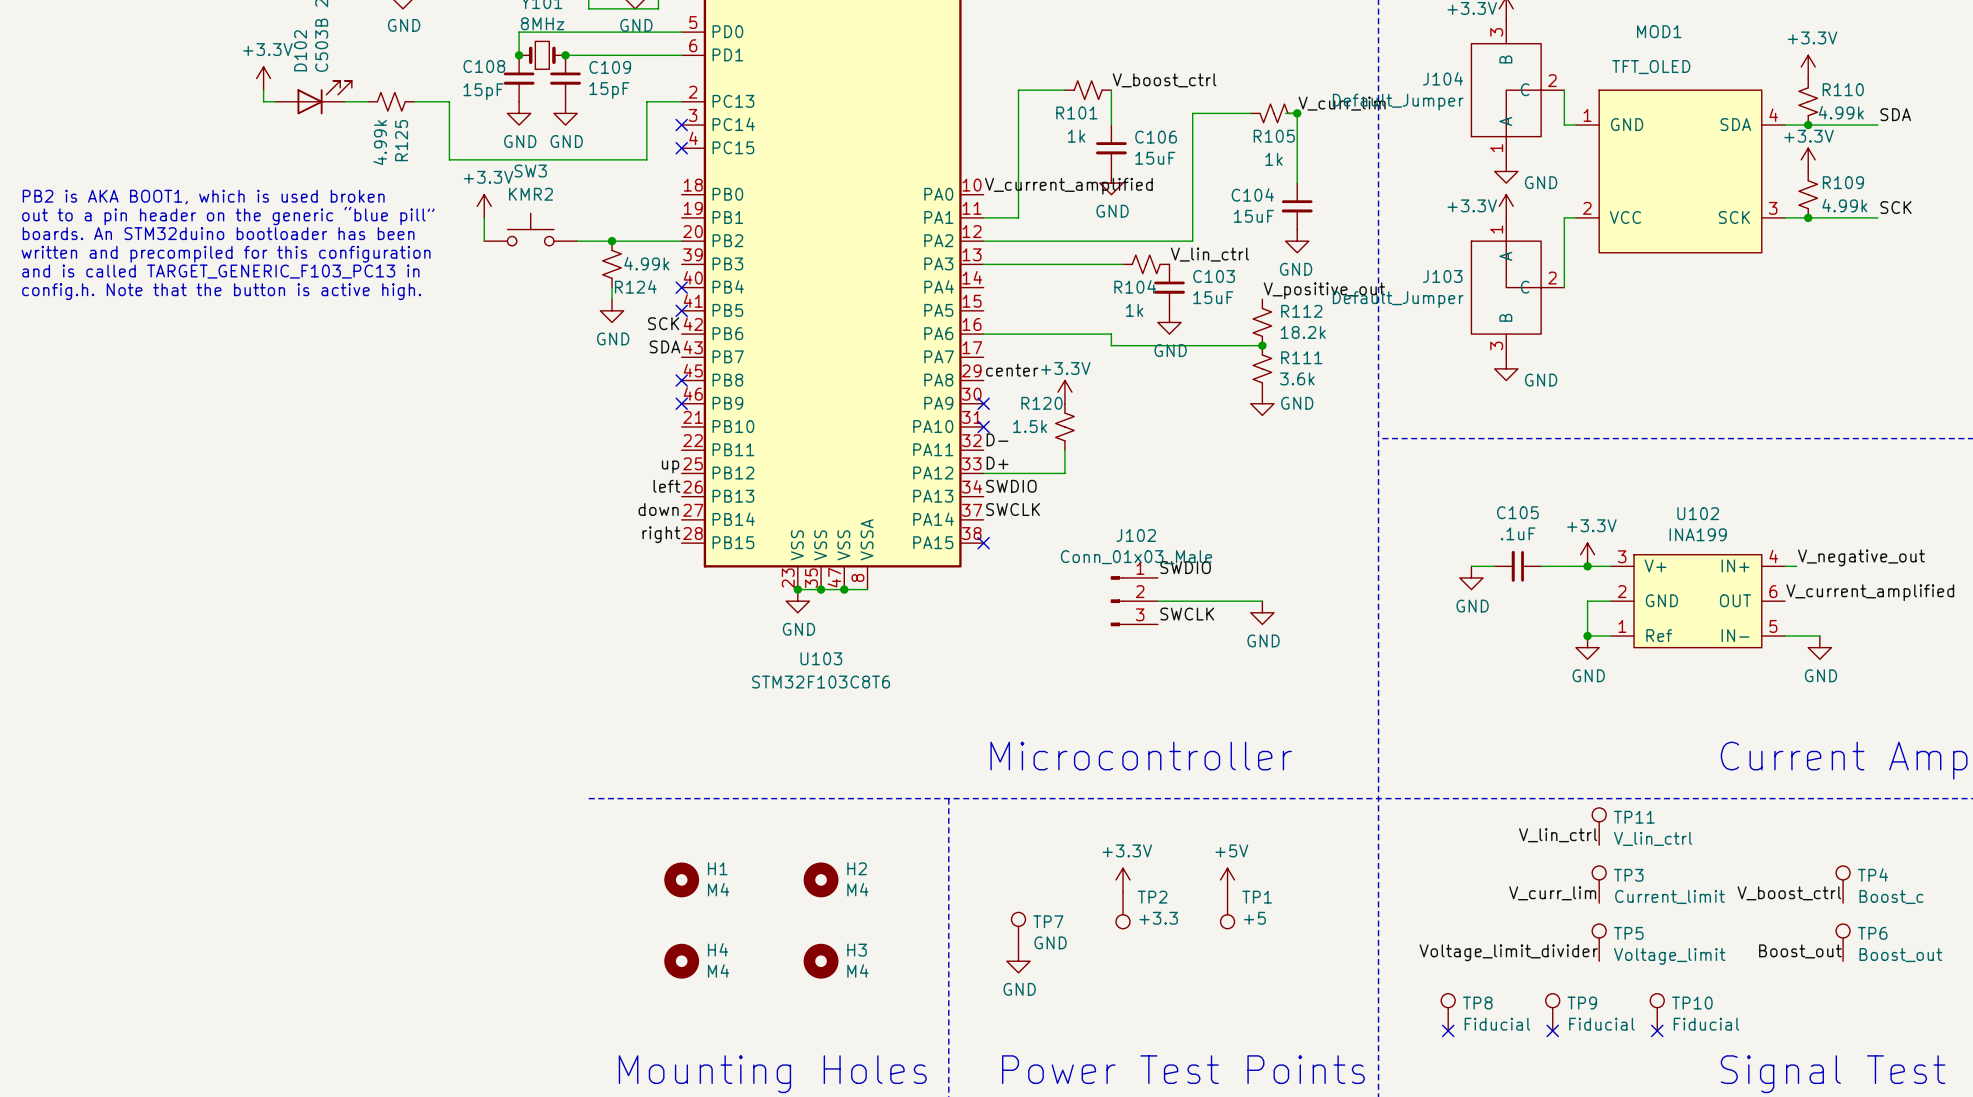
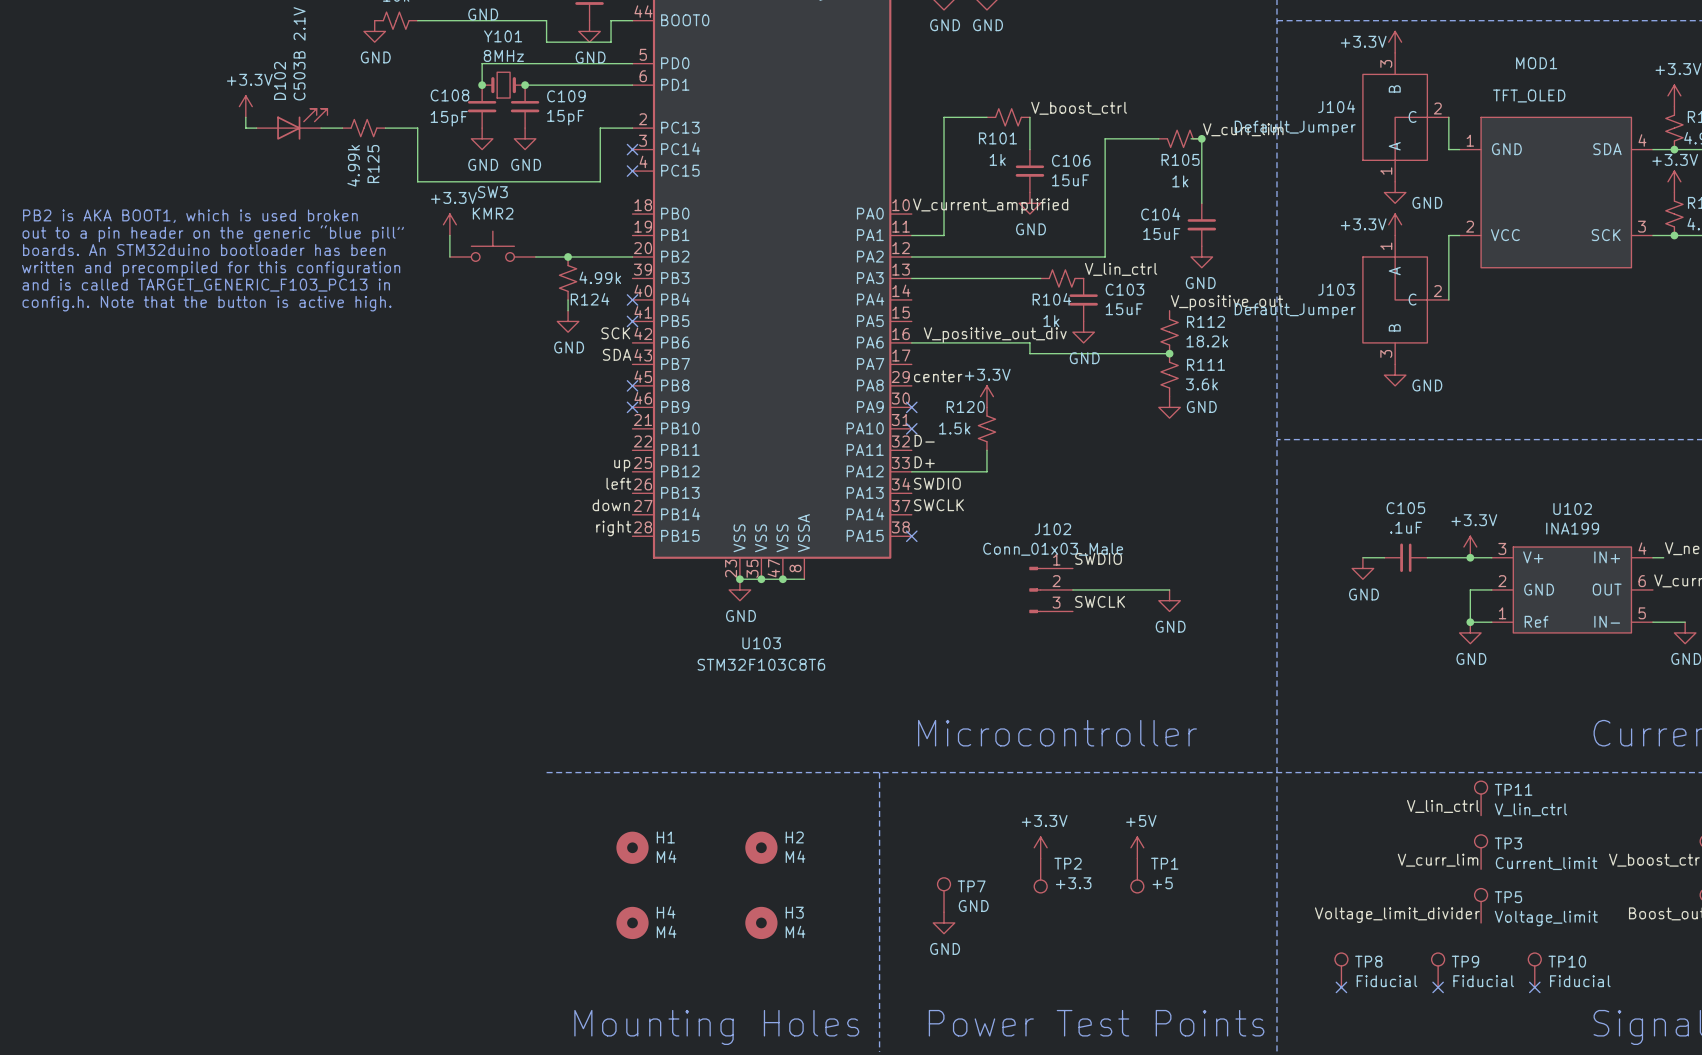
label: none -> V_positive_out_div (995, 335)

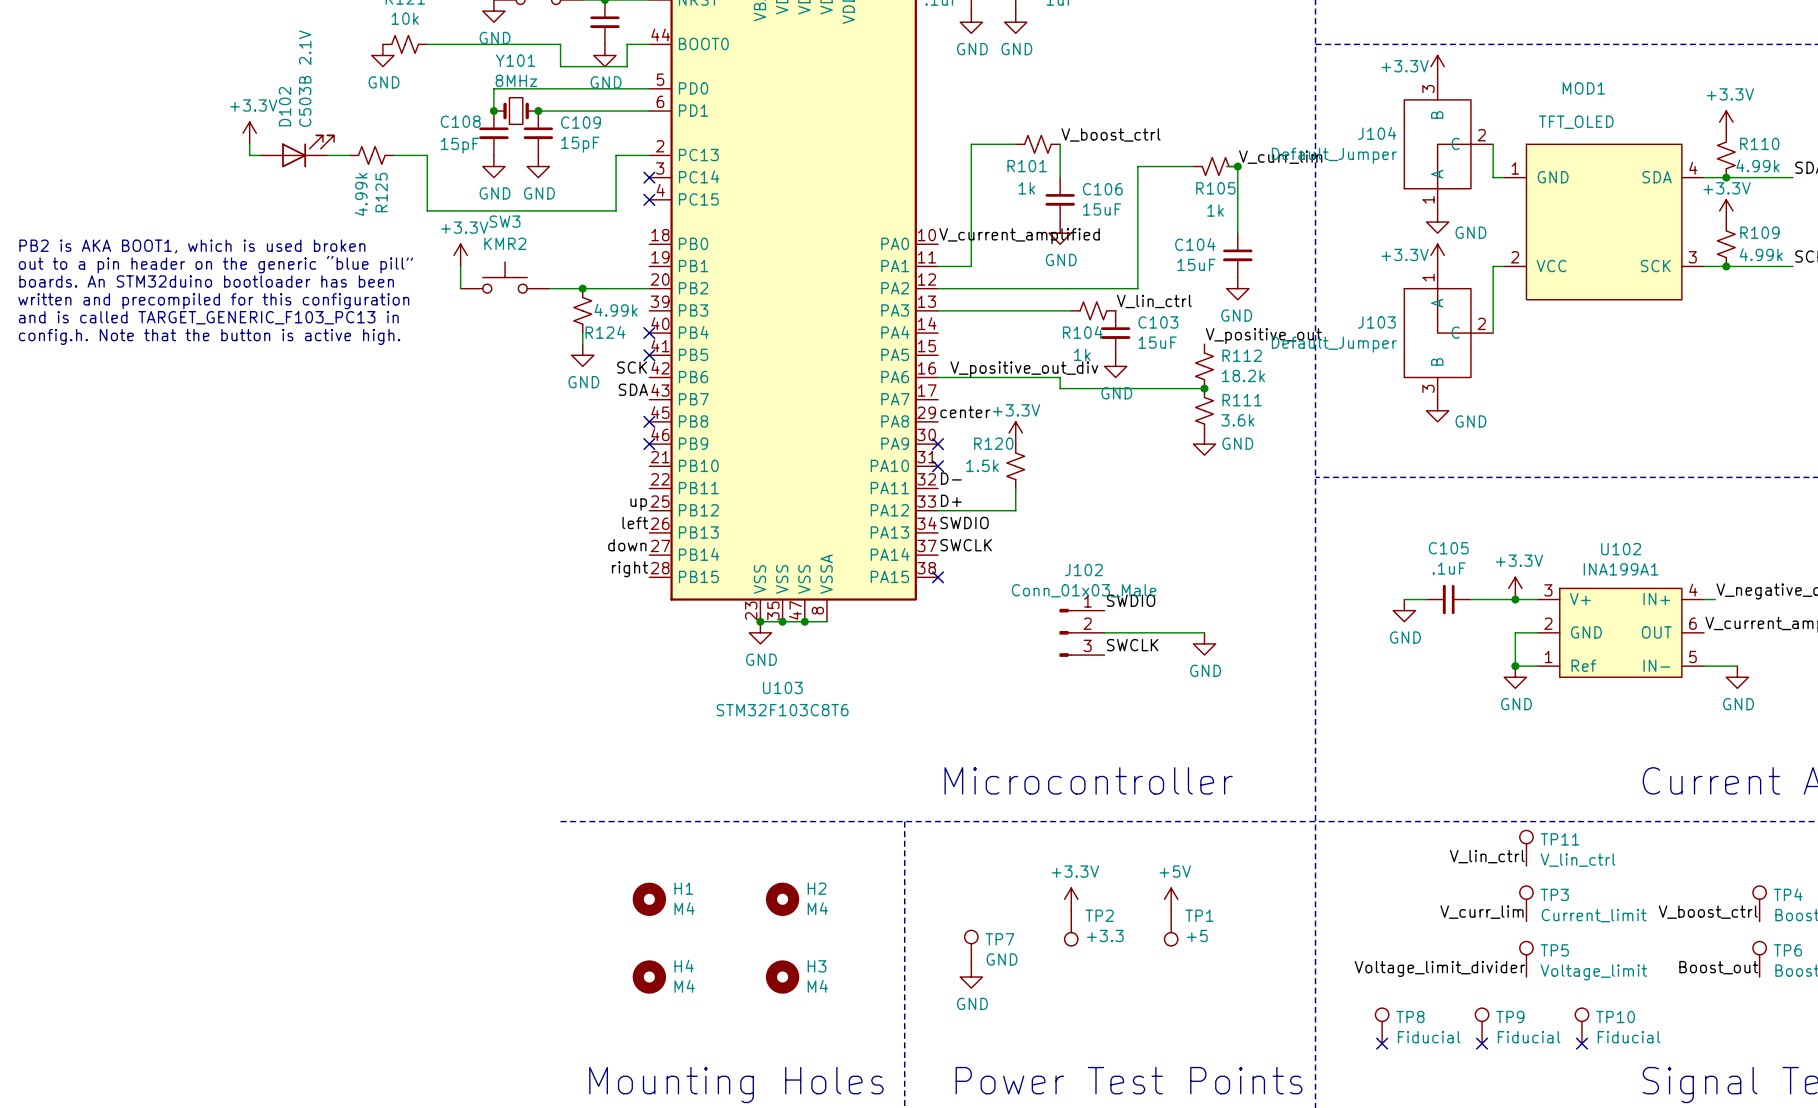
U102 value: INA199 (1572, 528) -> INA199A1 (1621, 569)

